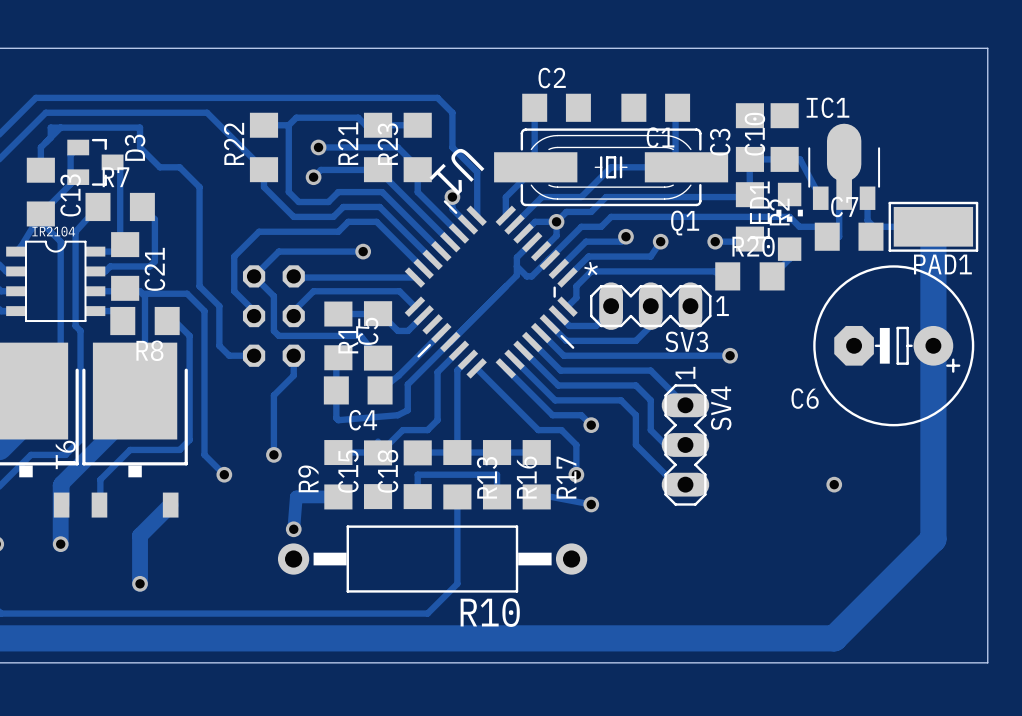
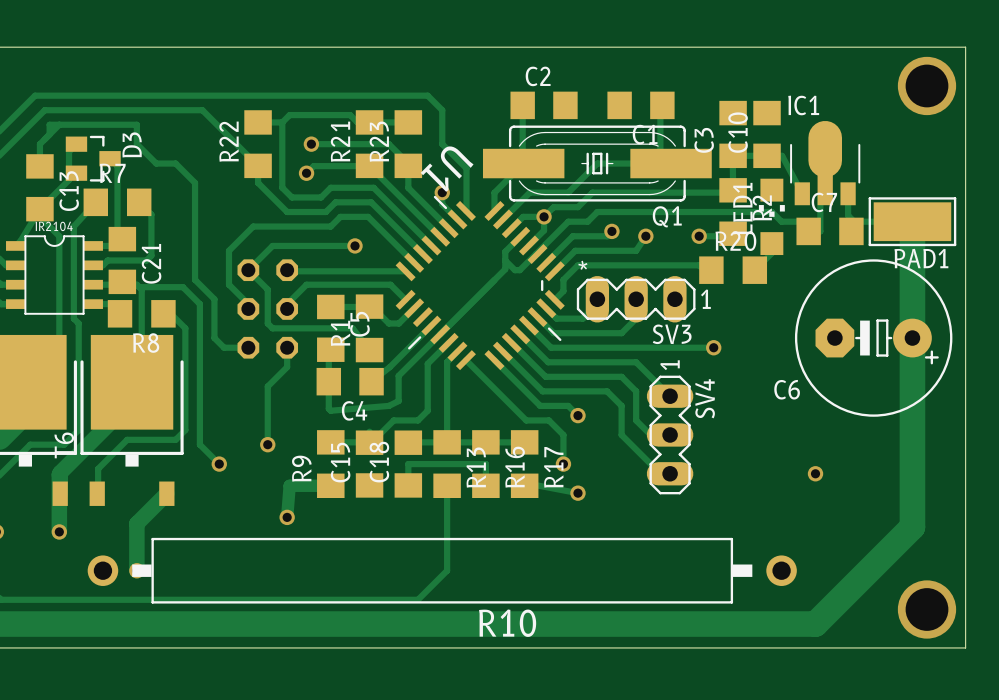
via: none -> (926, 85)
R10 footprint: [277, 525, 588, 593] -> [87, 537, 797, 604]
via: none -> (926, 609)

